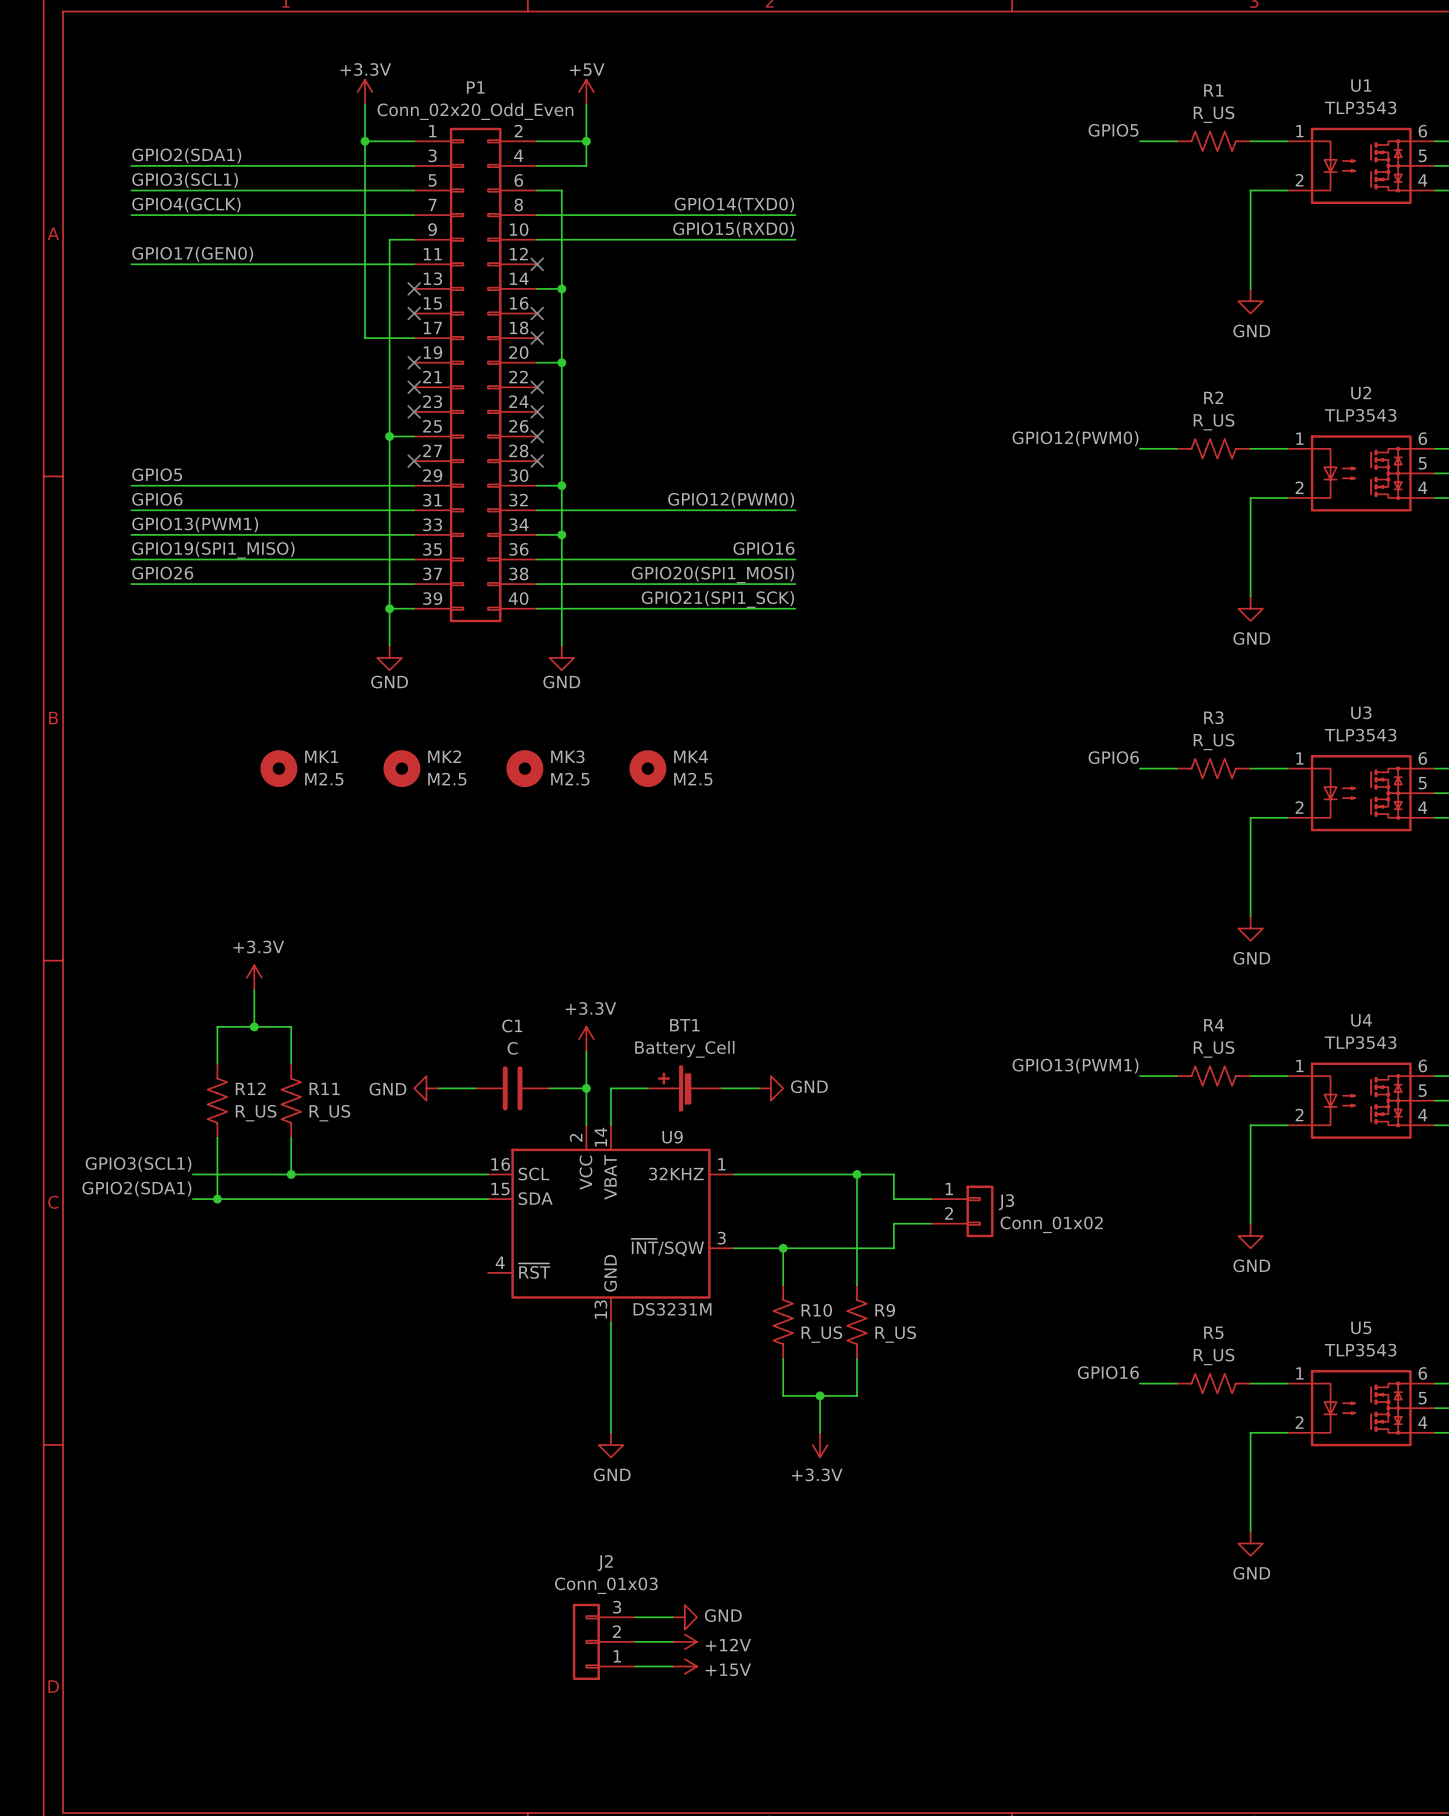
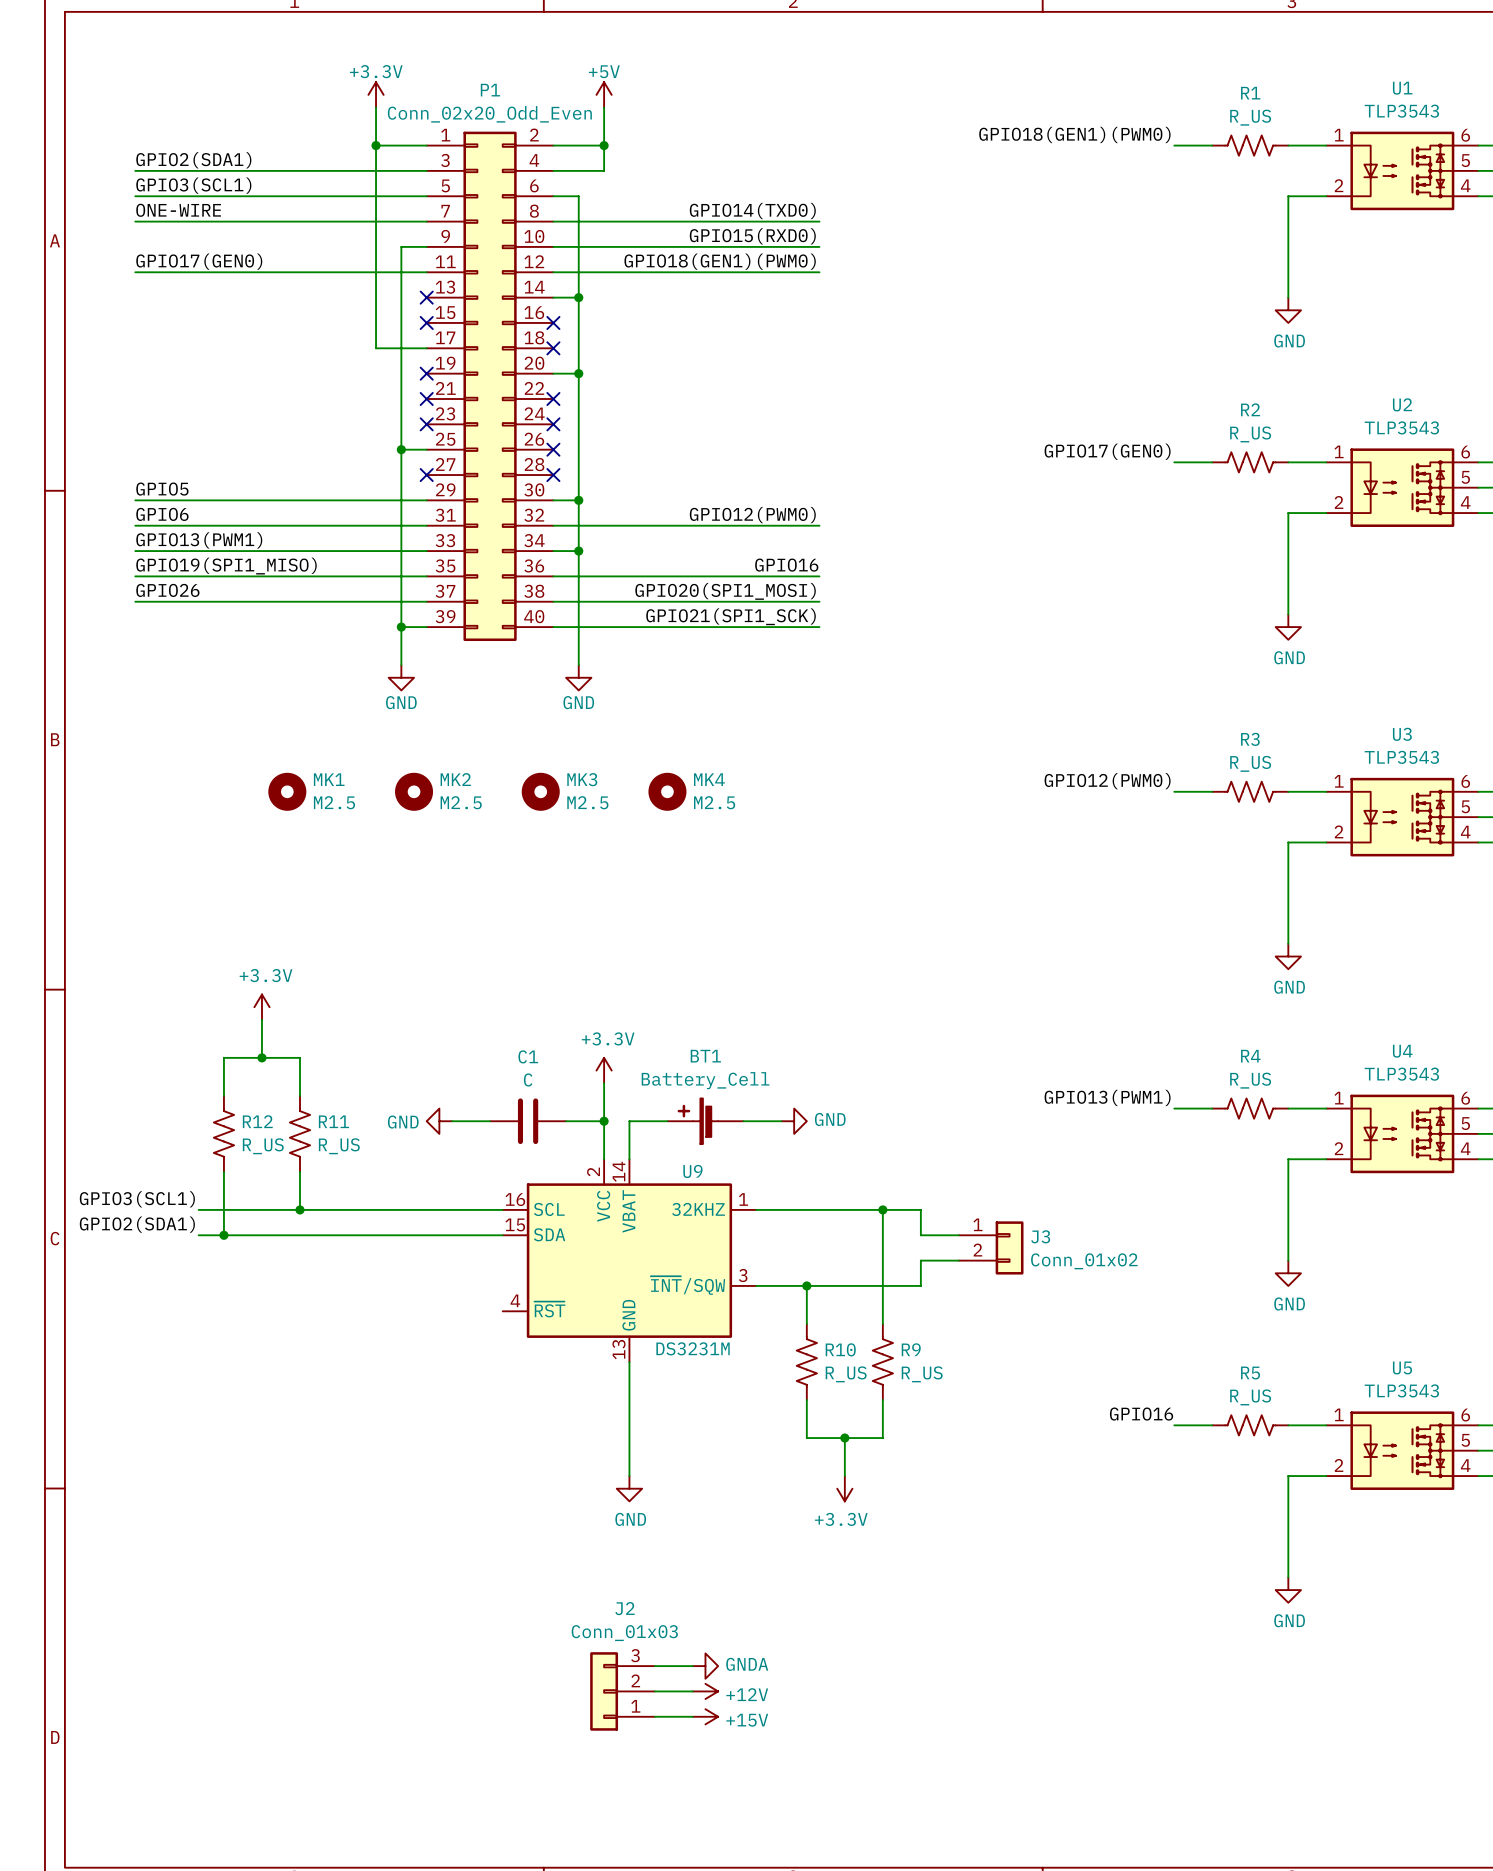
label: GPIO5 (1113, 130) -> GPIO18(GEN1)(PWM0) (1074, 134)
label: GPIO4(GCLK) (186, 205) -> ONE-WIRE (178, 210)
label: none -> GPIO18(GEN1)(PWM0) (720, 261)
wire: none -> (553, 272) (819, 272)
no-connect mark: (537, 264) -> none
label: GPIO12(PWM0) (1075, 438) -> GPIO17(GEN0) (1107, 451)
label: GPIO6 (1113, 757) -> GPIO12(PWM0) (1107, 781)
power symbol: GND (684, 1617) -> GNDA (705, 1666)

